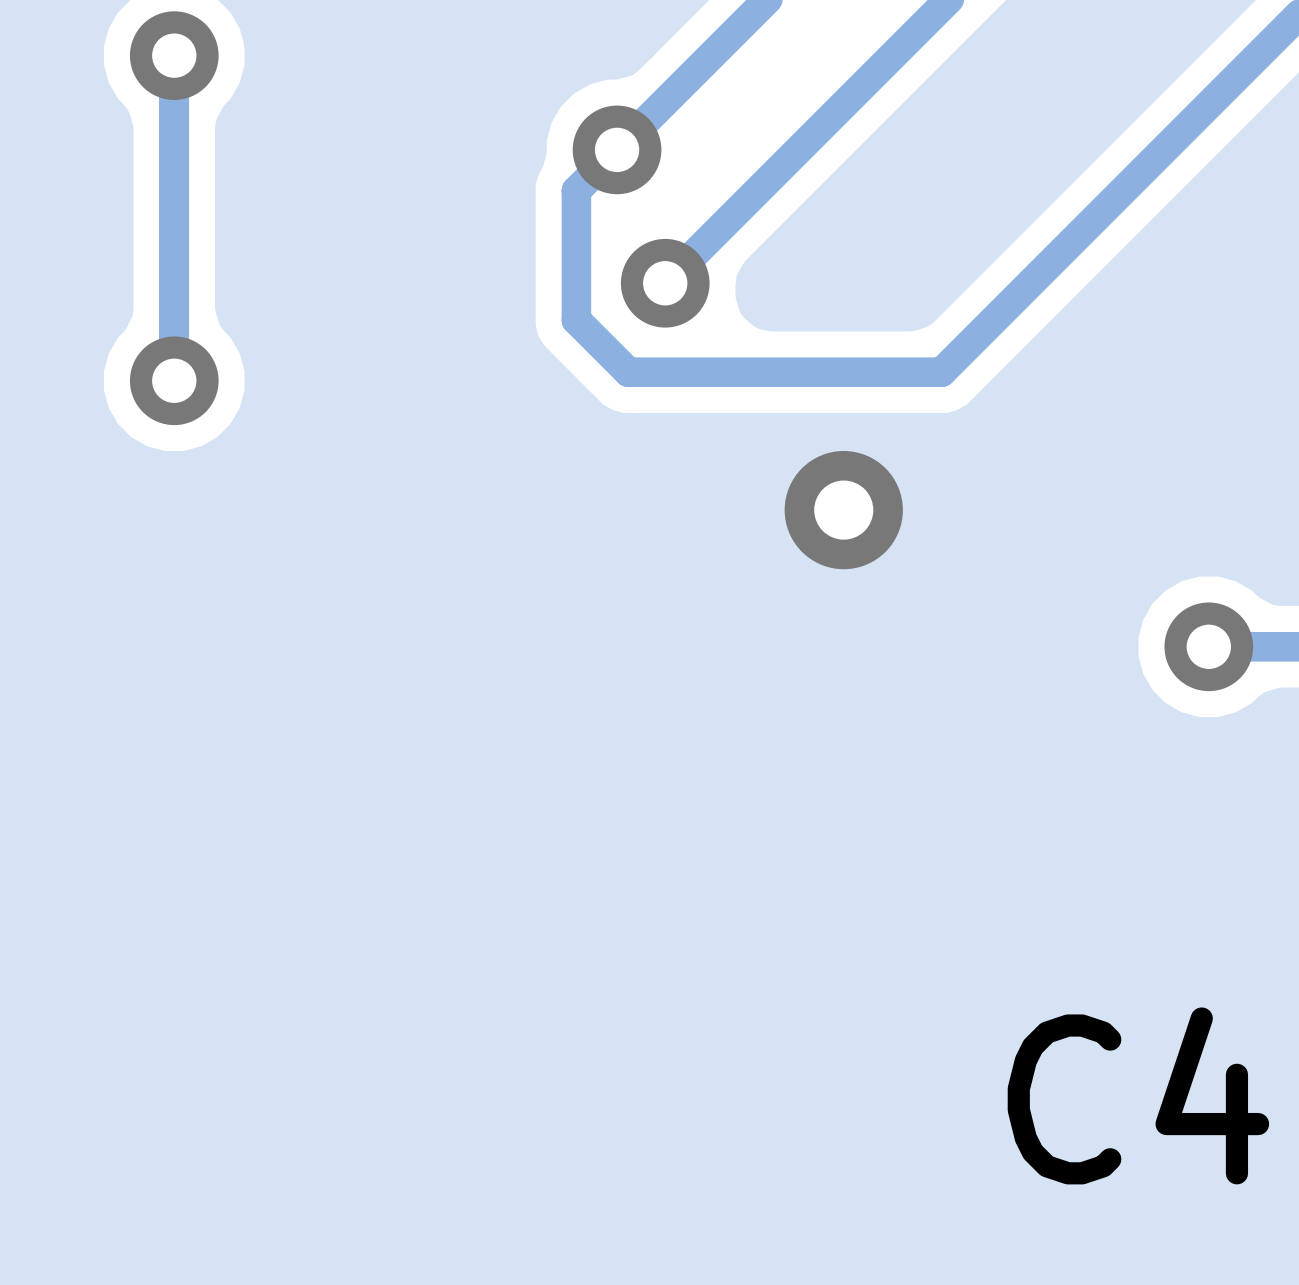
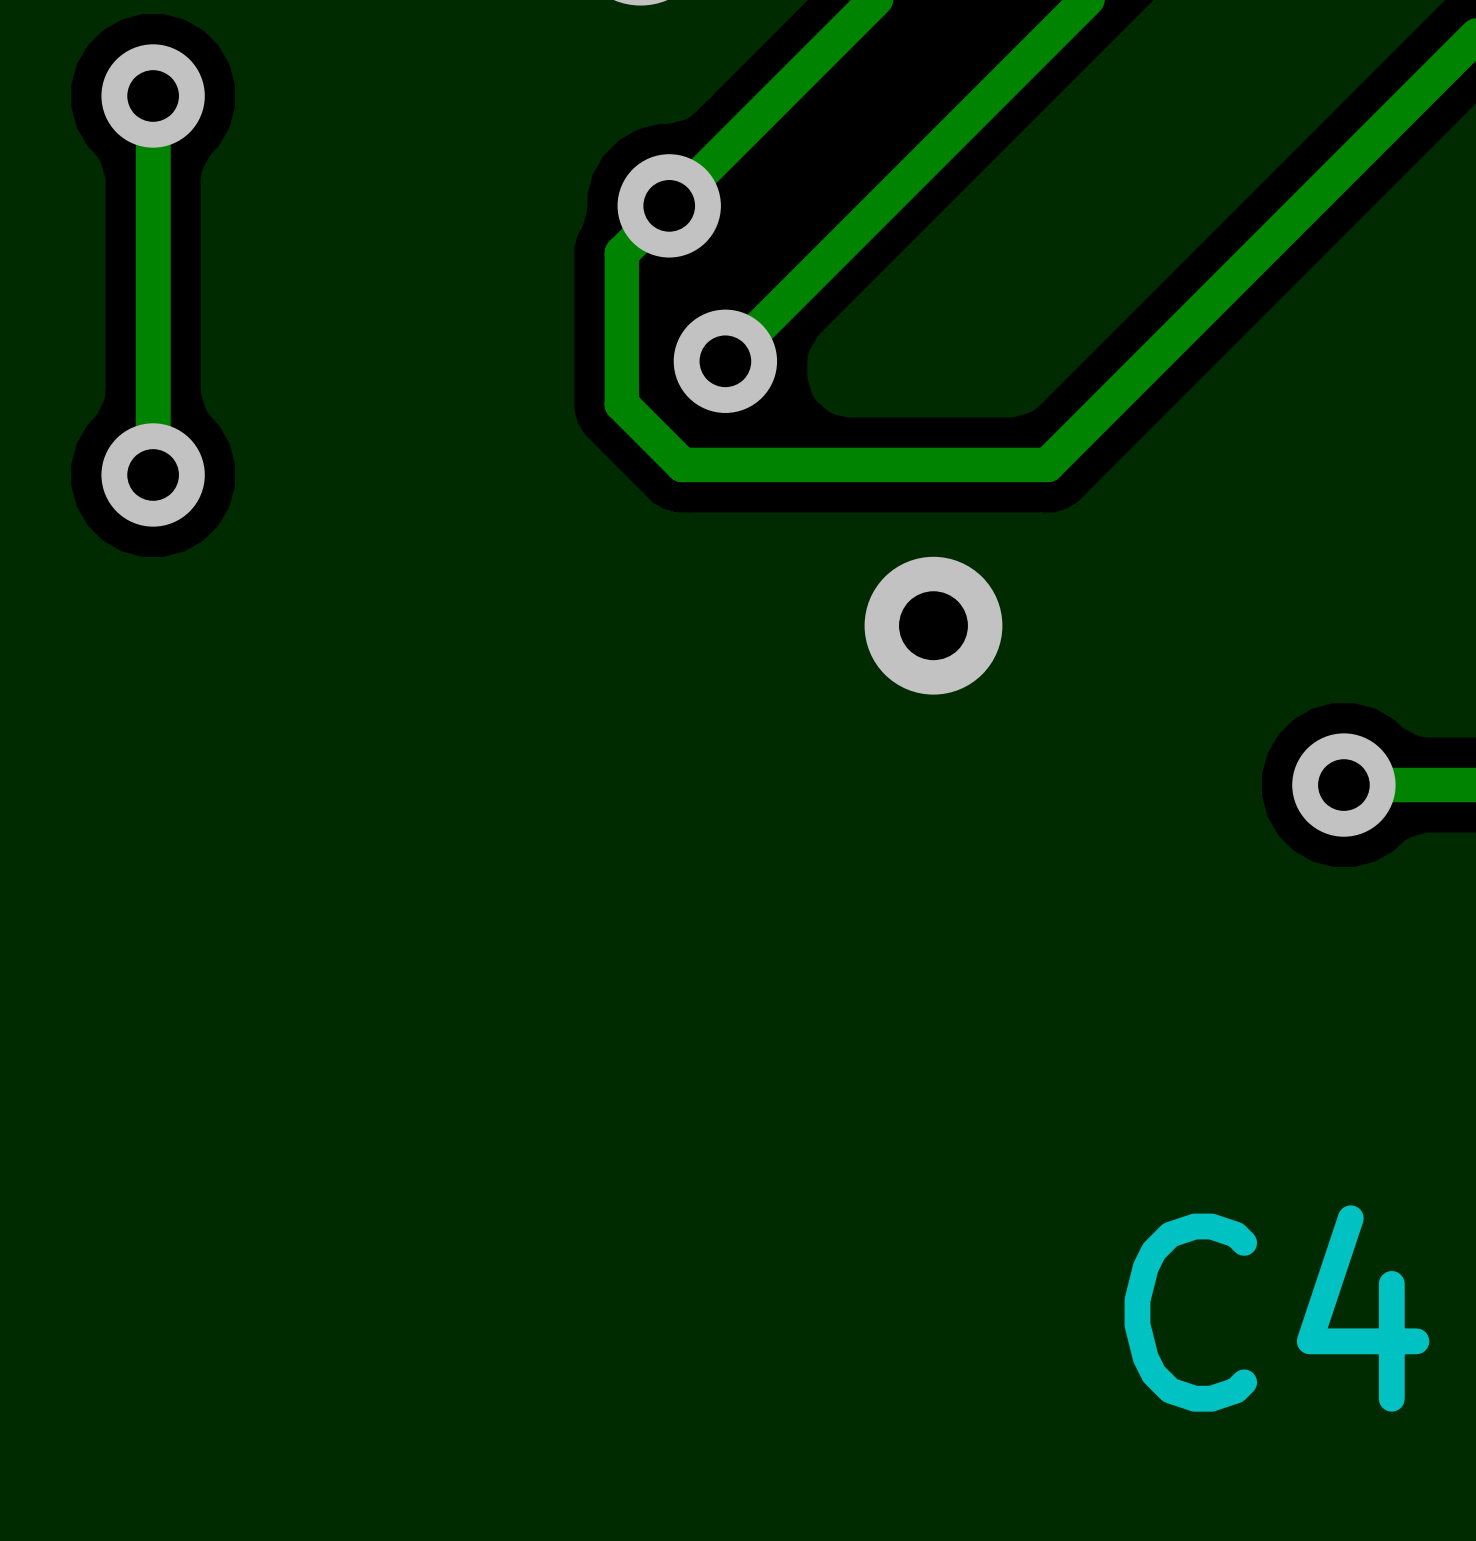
via position: (1208, 646) -> (1343, 785)

